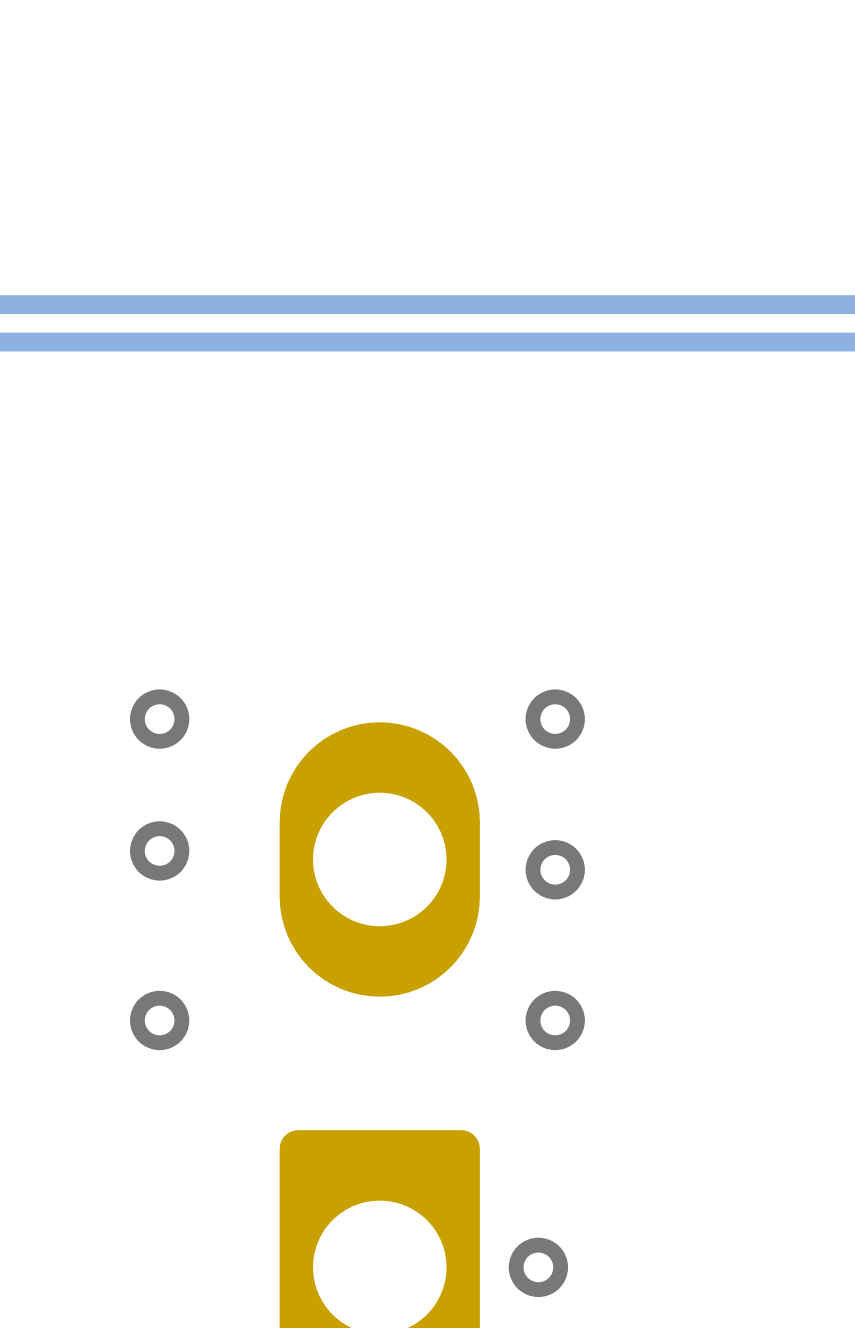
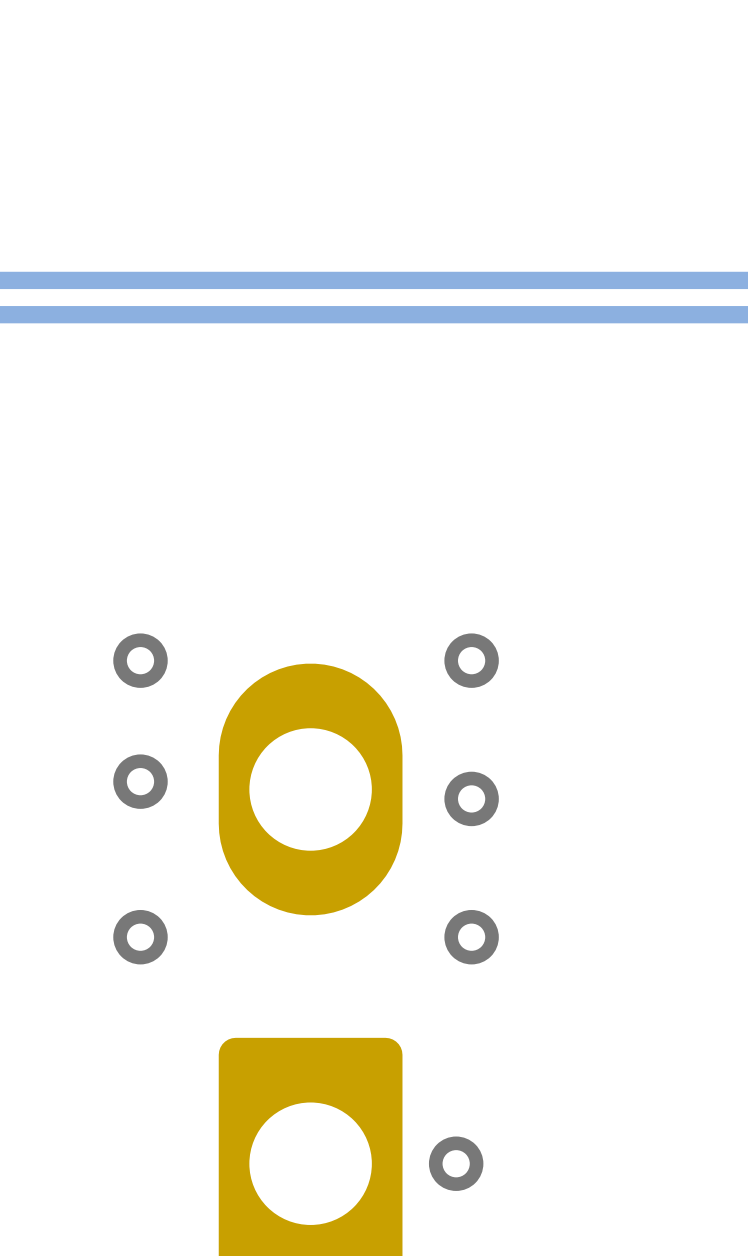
via position: (159, 719) -> (140, 660)
via position: (159, 850) -> (140, 781)
via position: (159, 1020) -> (140, 937)

